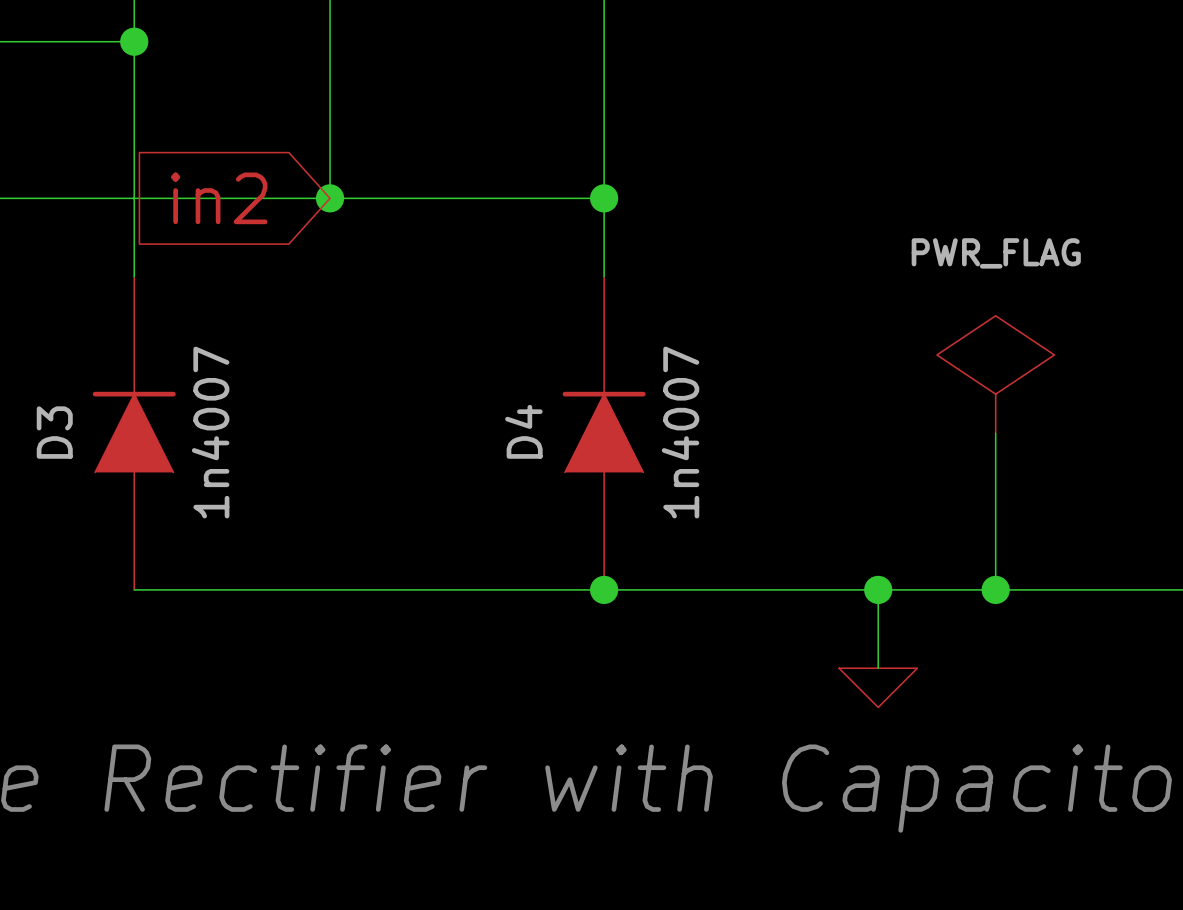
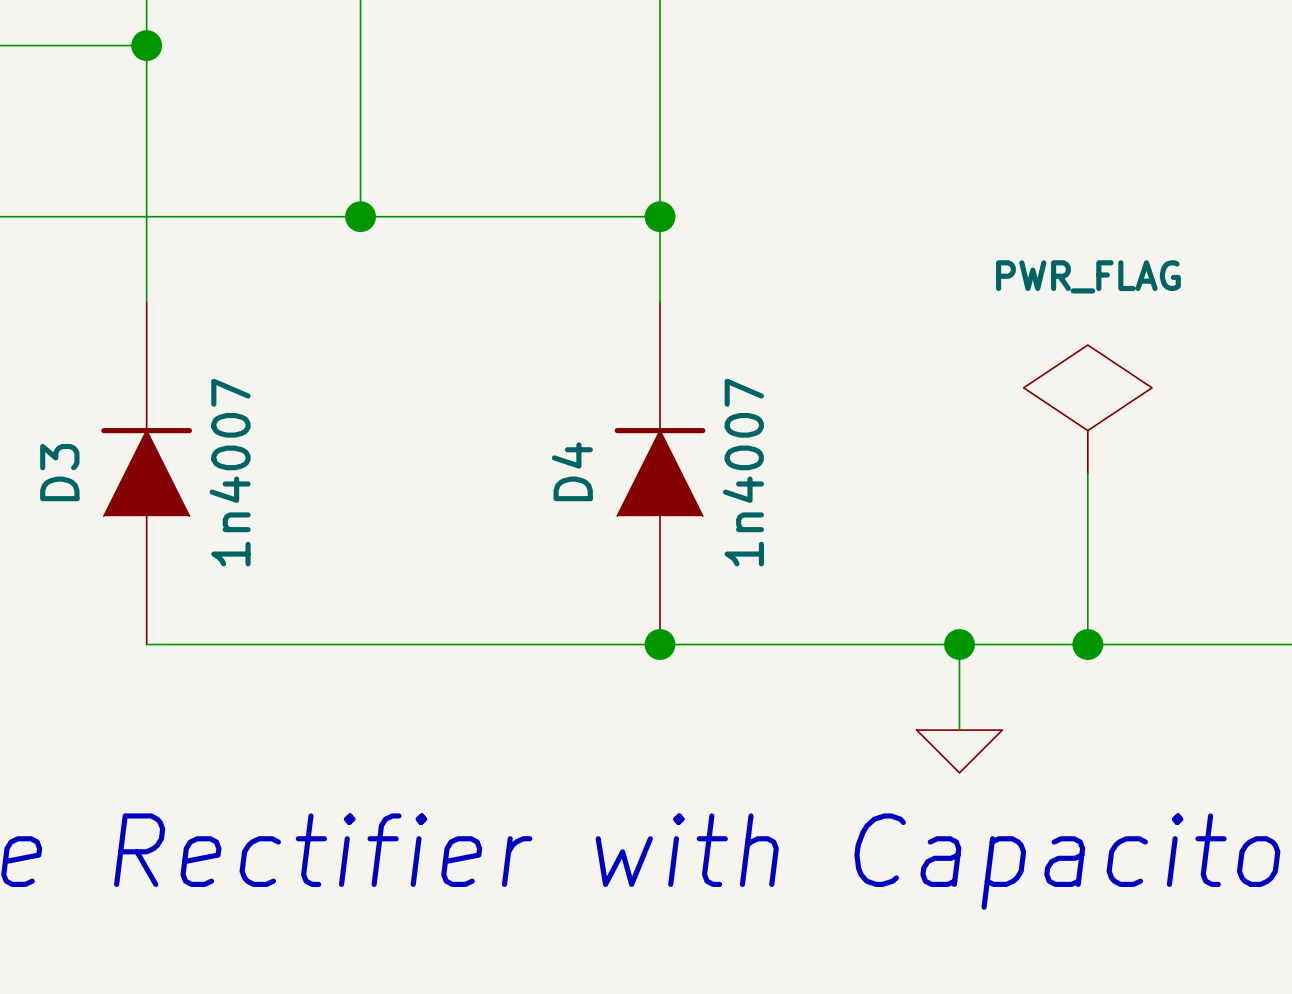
global label: in2 (219, 198) -> none

